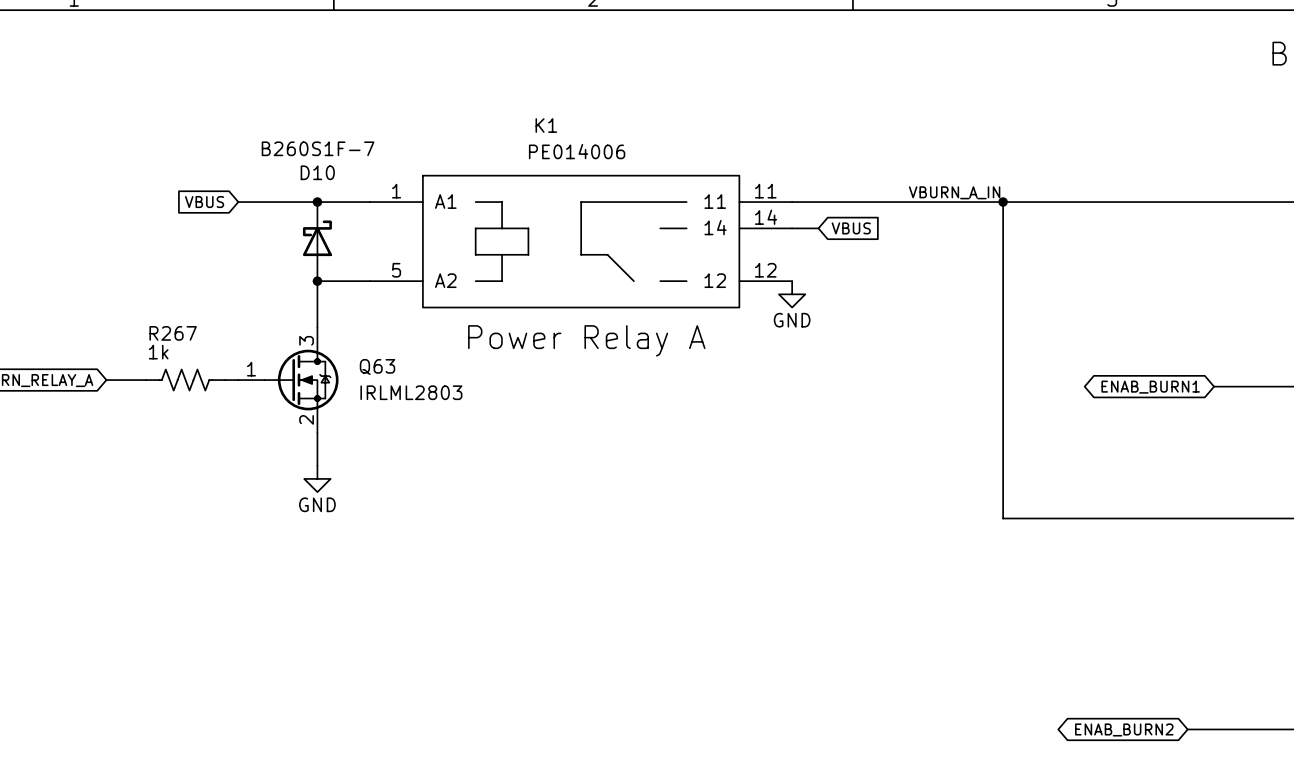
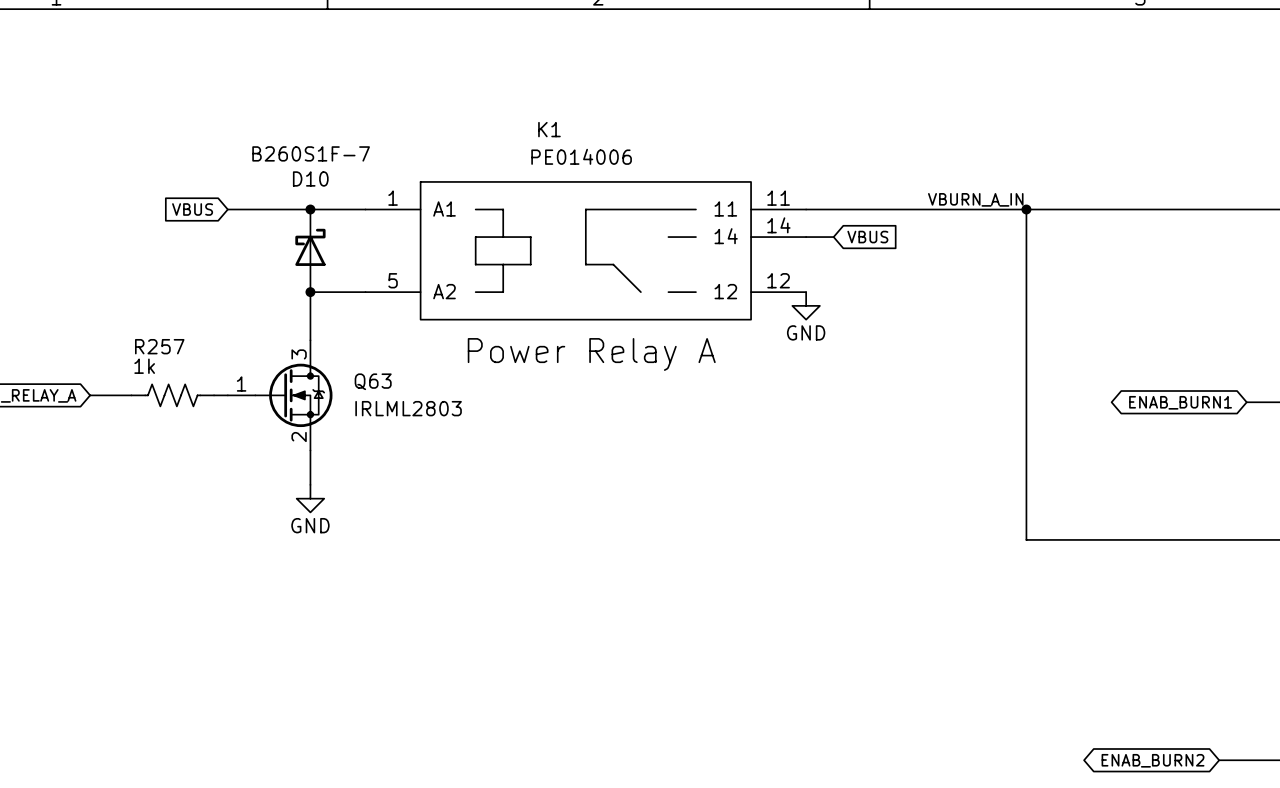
R267 name: R267 (173, 333) -> R257 (159, 346)

